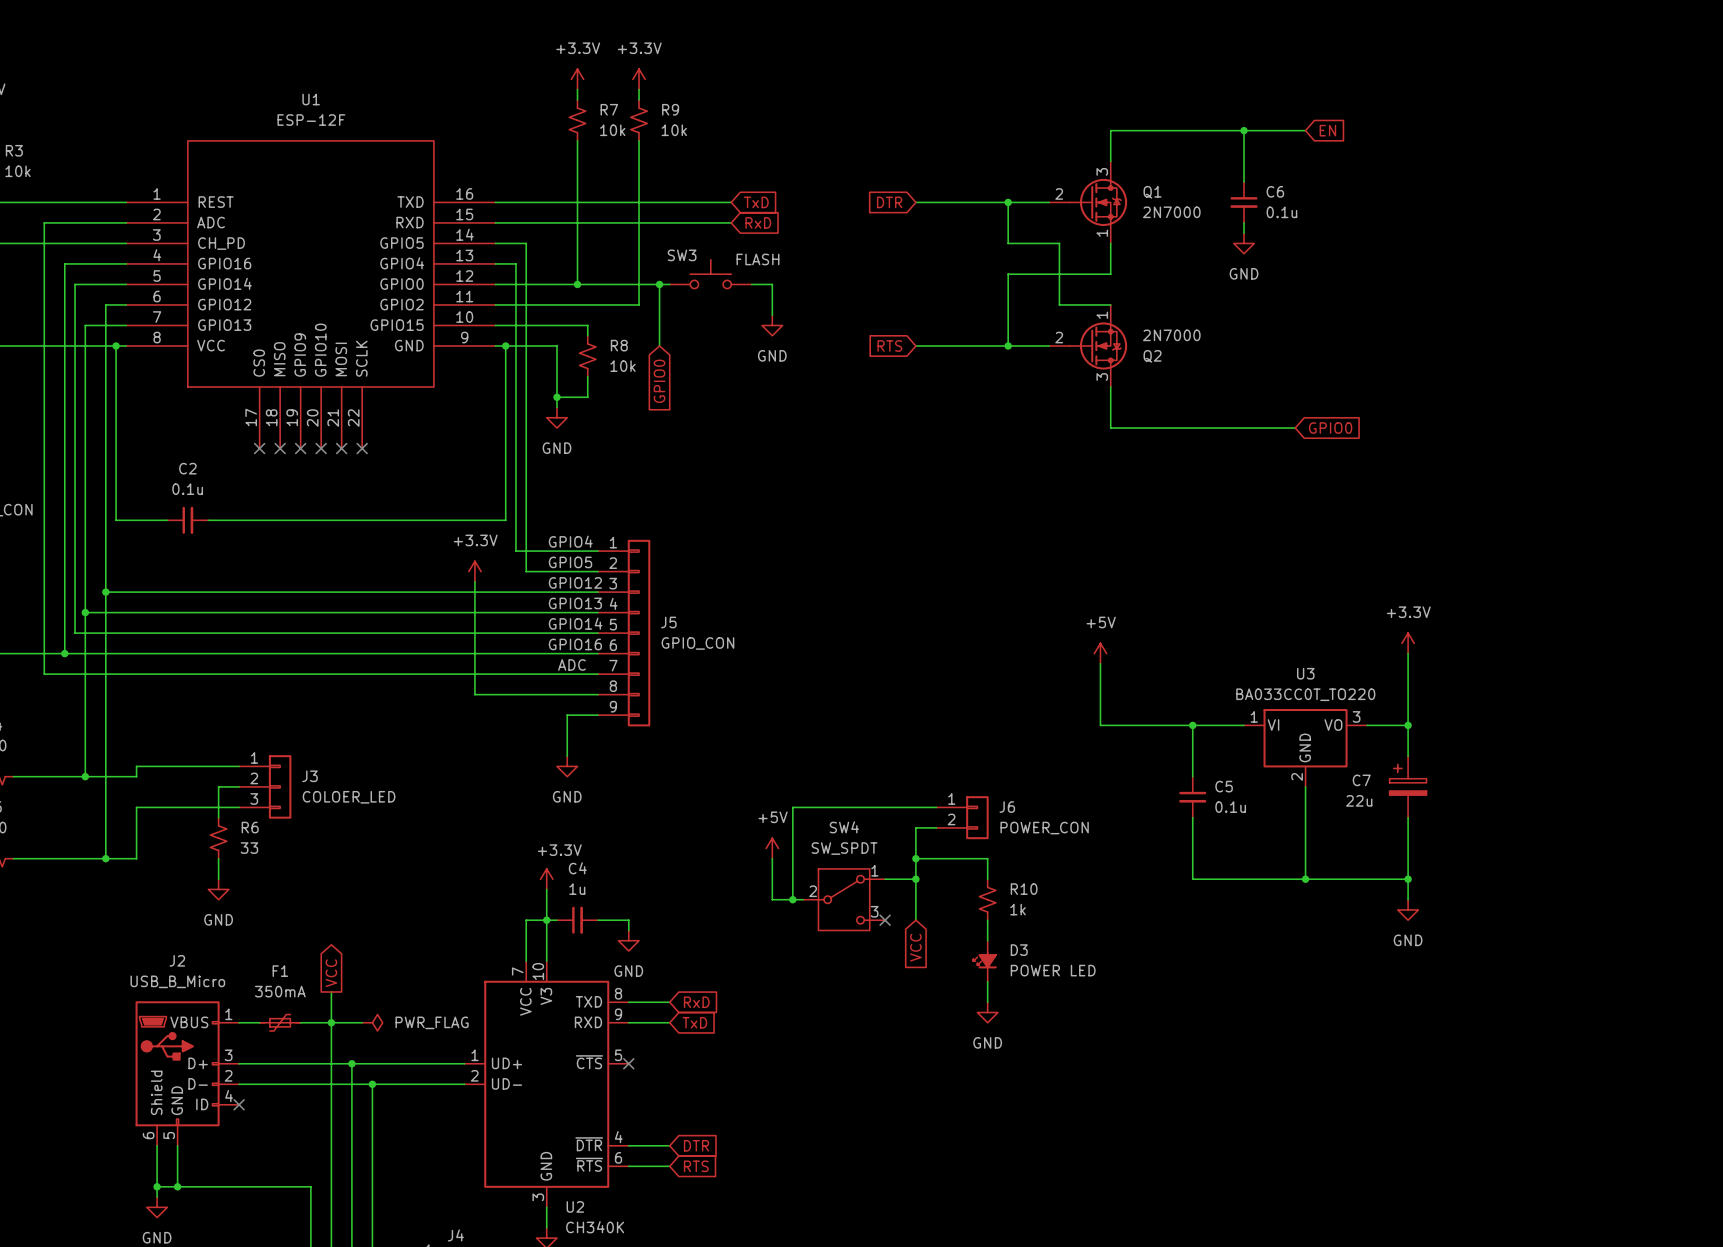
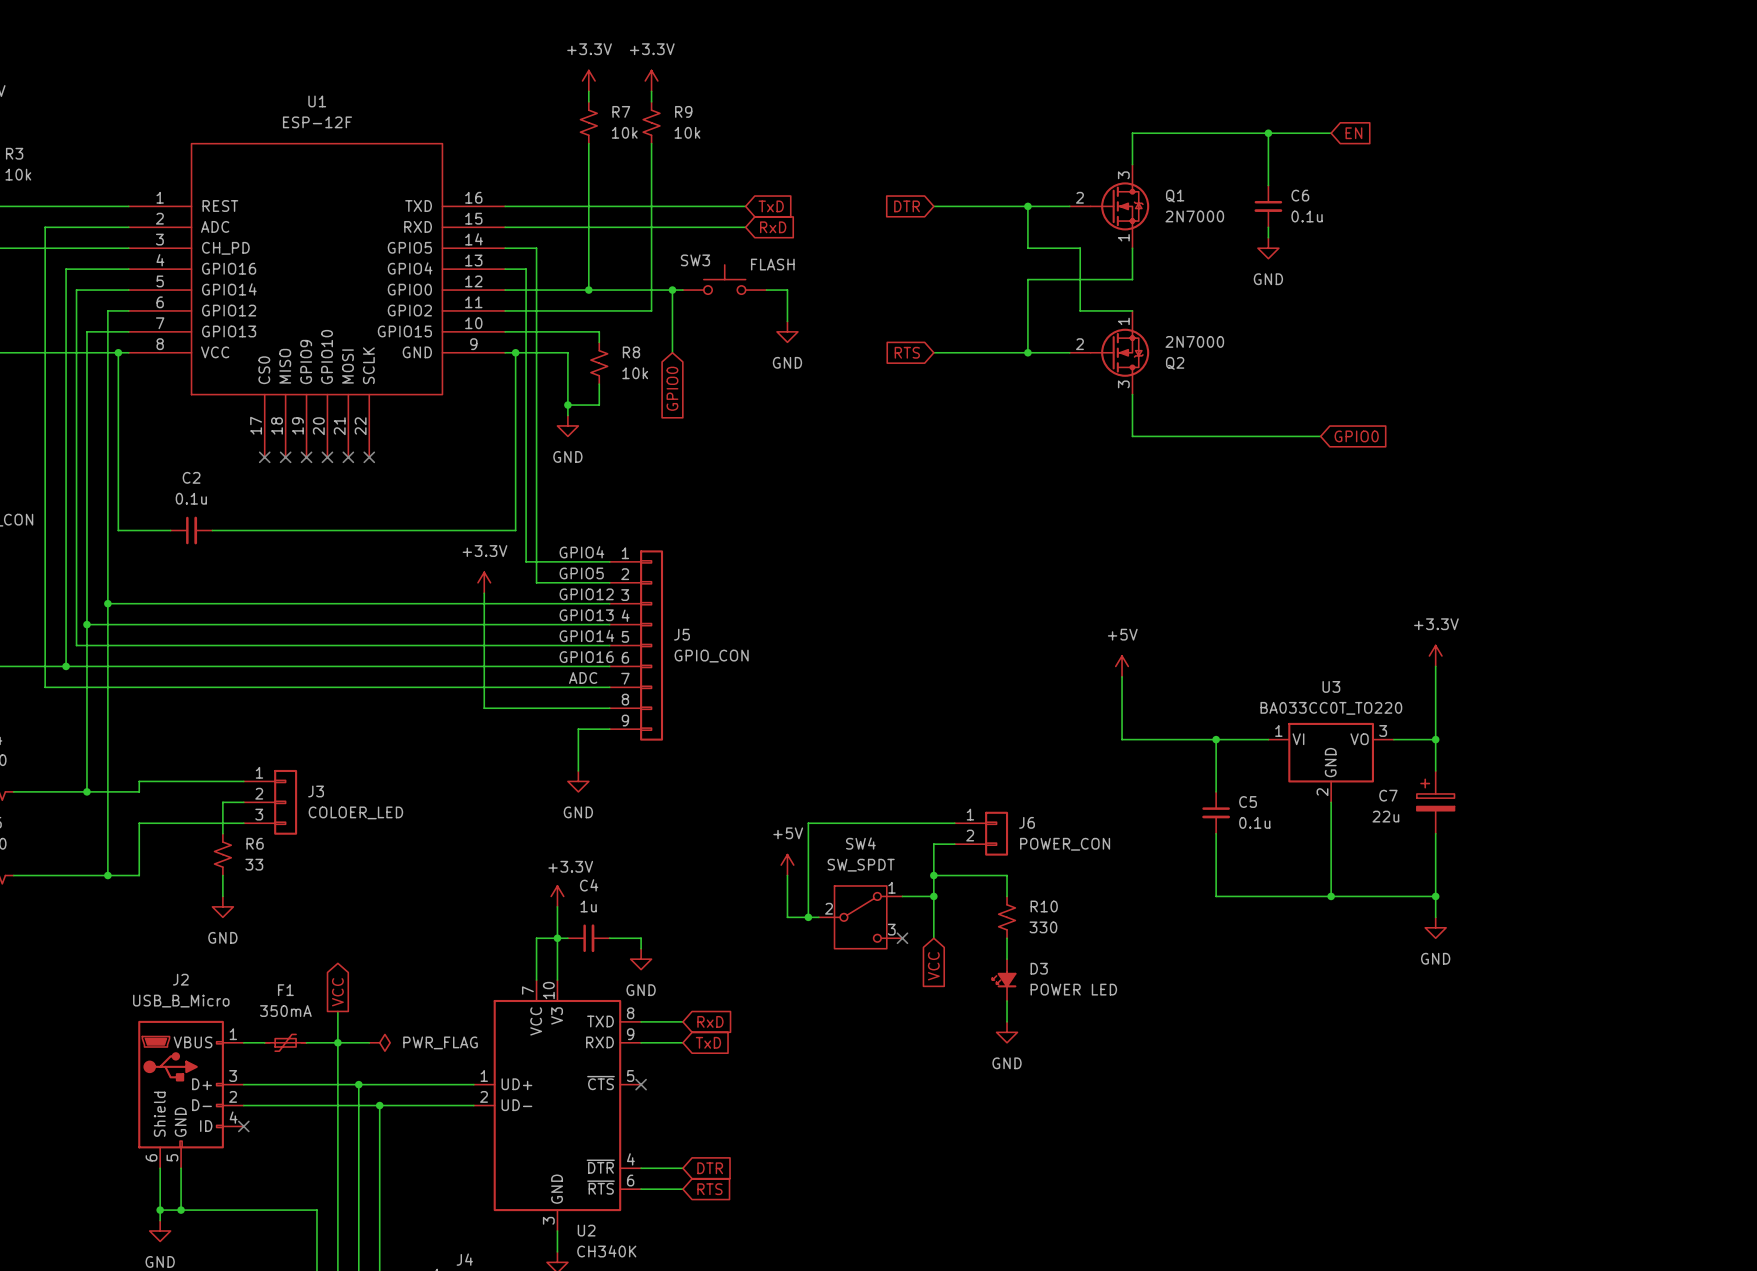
R10 value: 1k (1018, 909) -> 330 (1043, 927)

